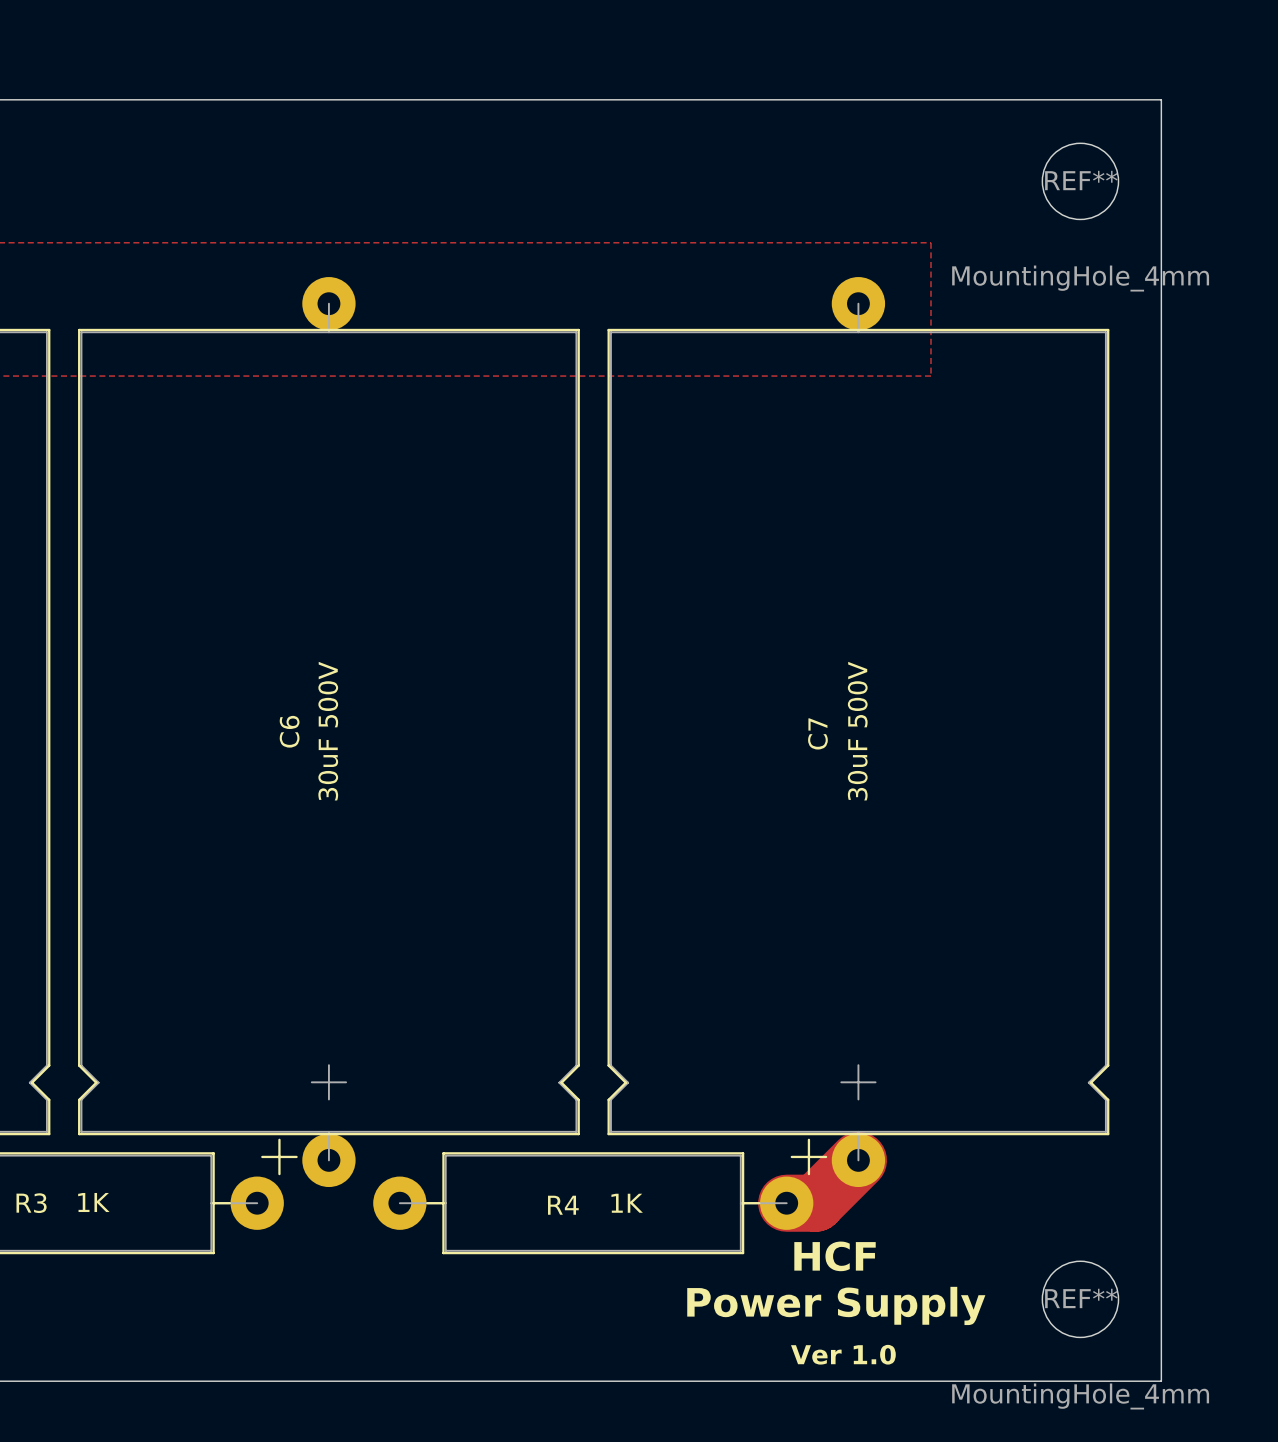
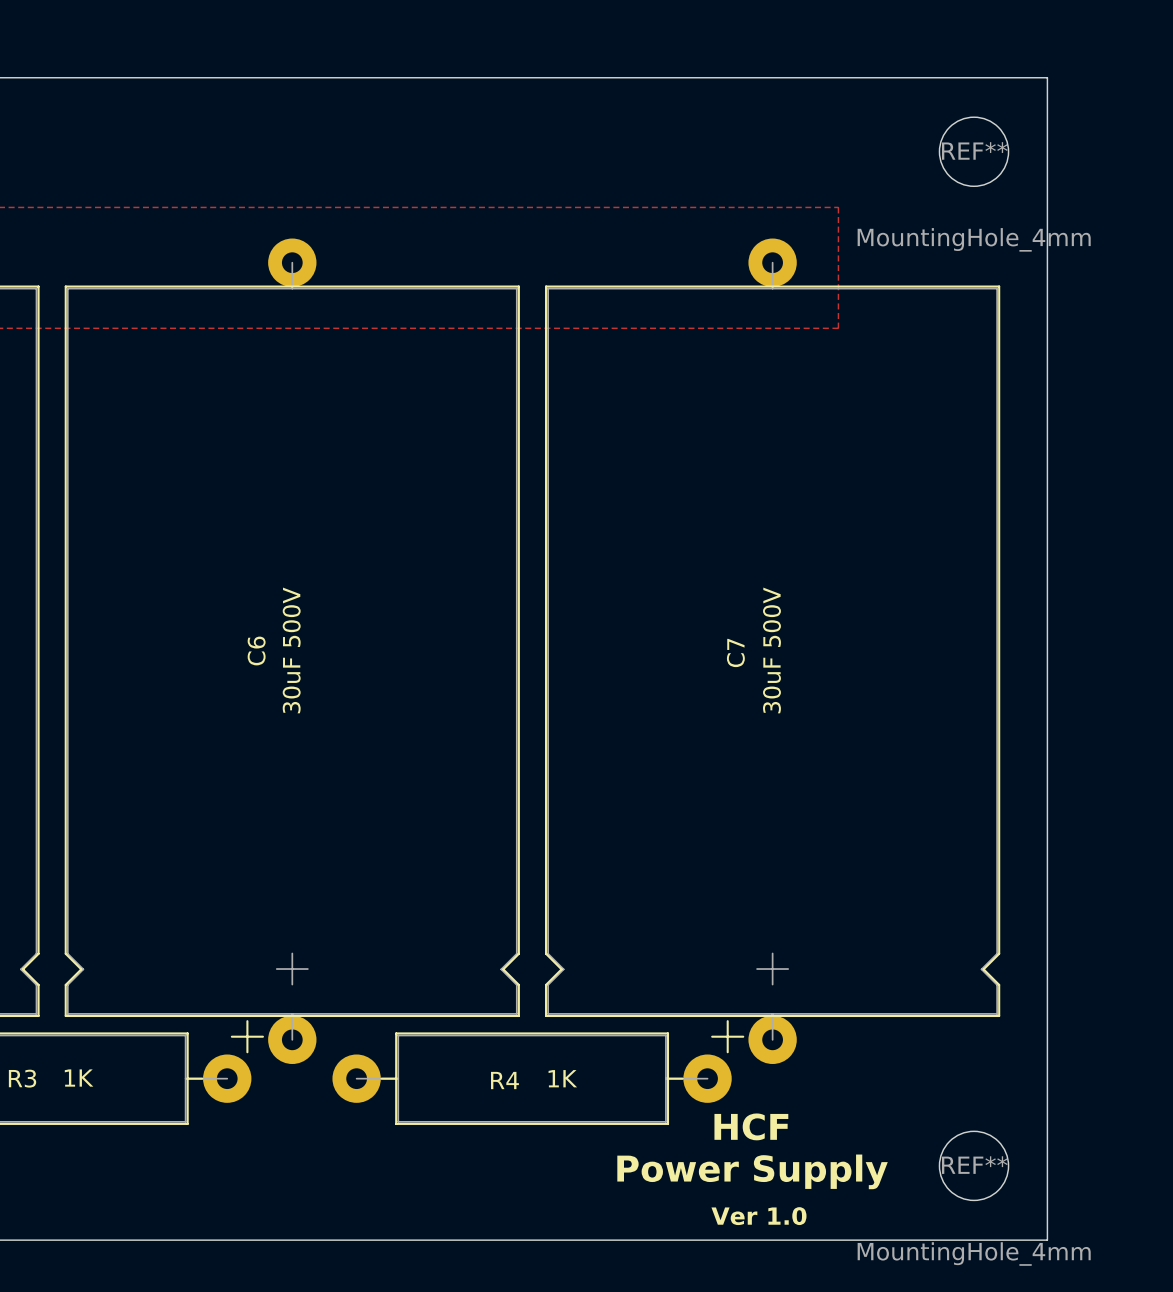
track: (858, 1160) (815, 1203) (786, 1203) -> none

